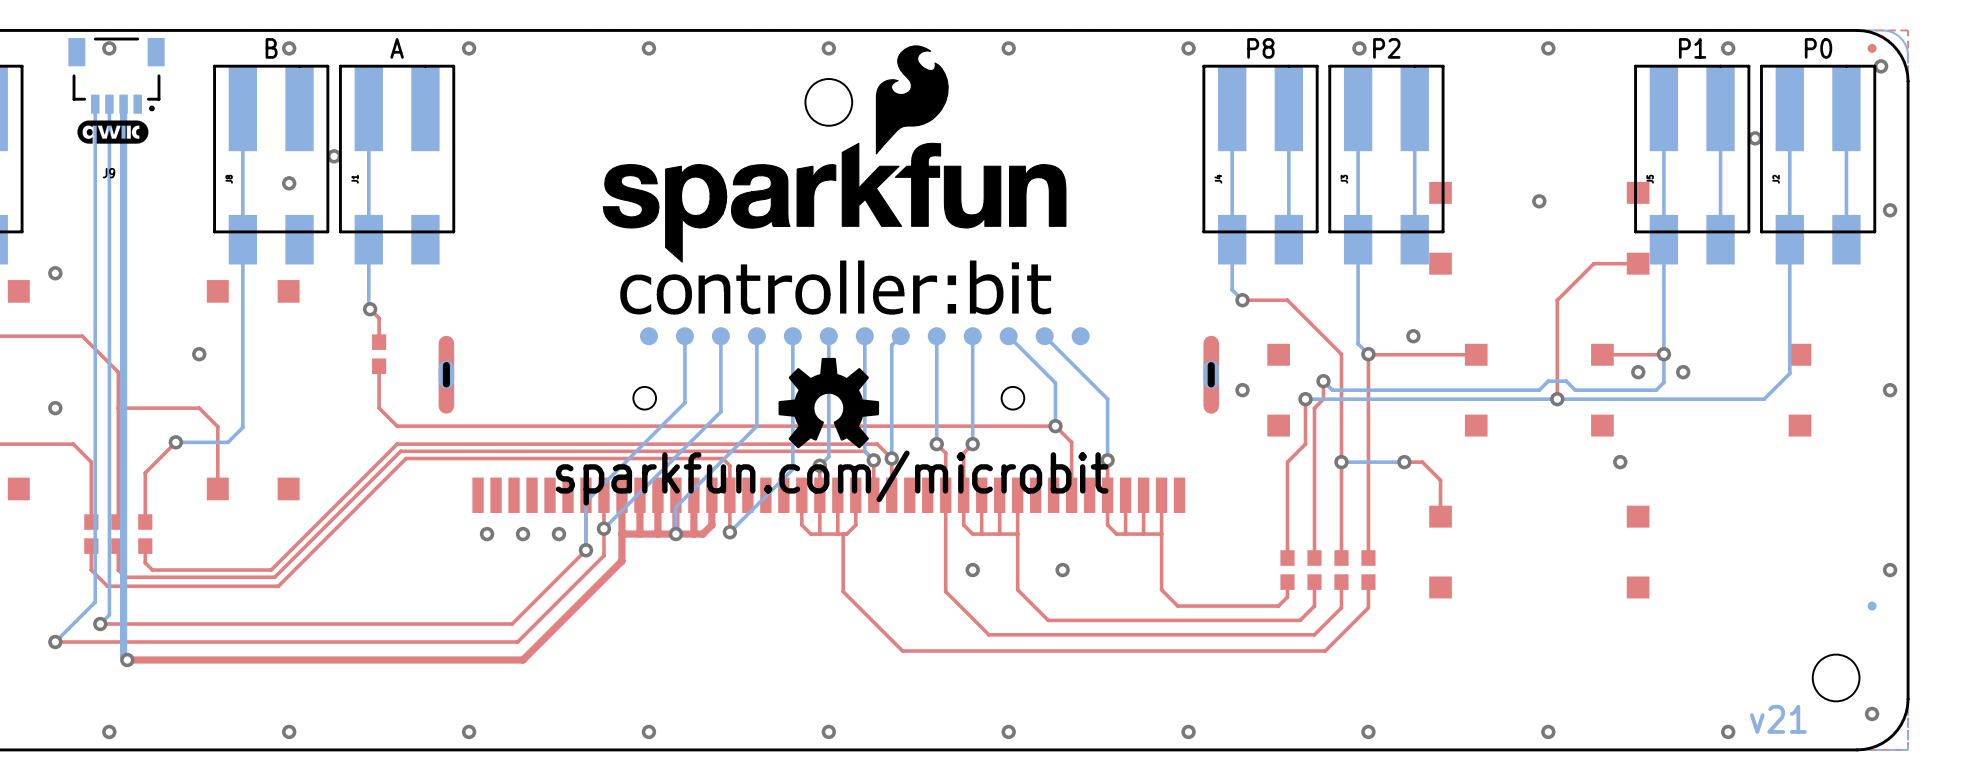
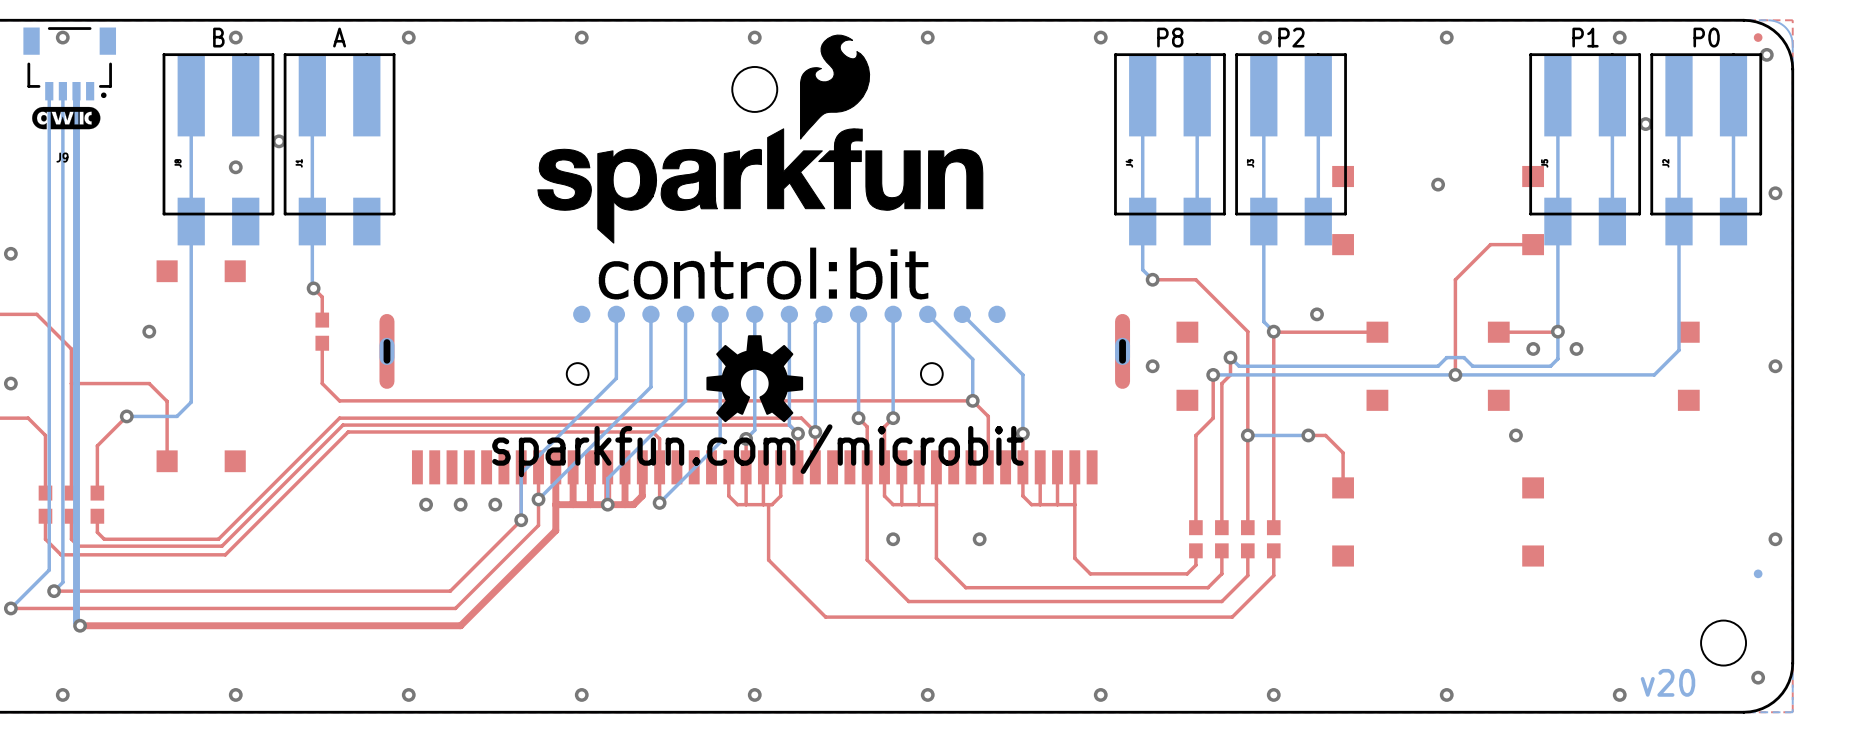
drawing shape: [620, 260, 1052, 315] -> [598, 247, 929, 300]
text: v21 (1778, 719) -> v20 (1667, 682)

